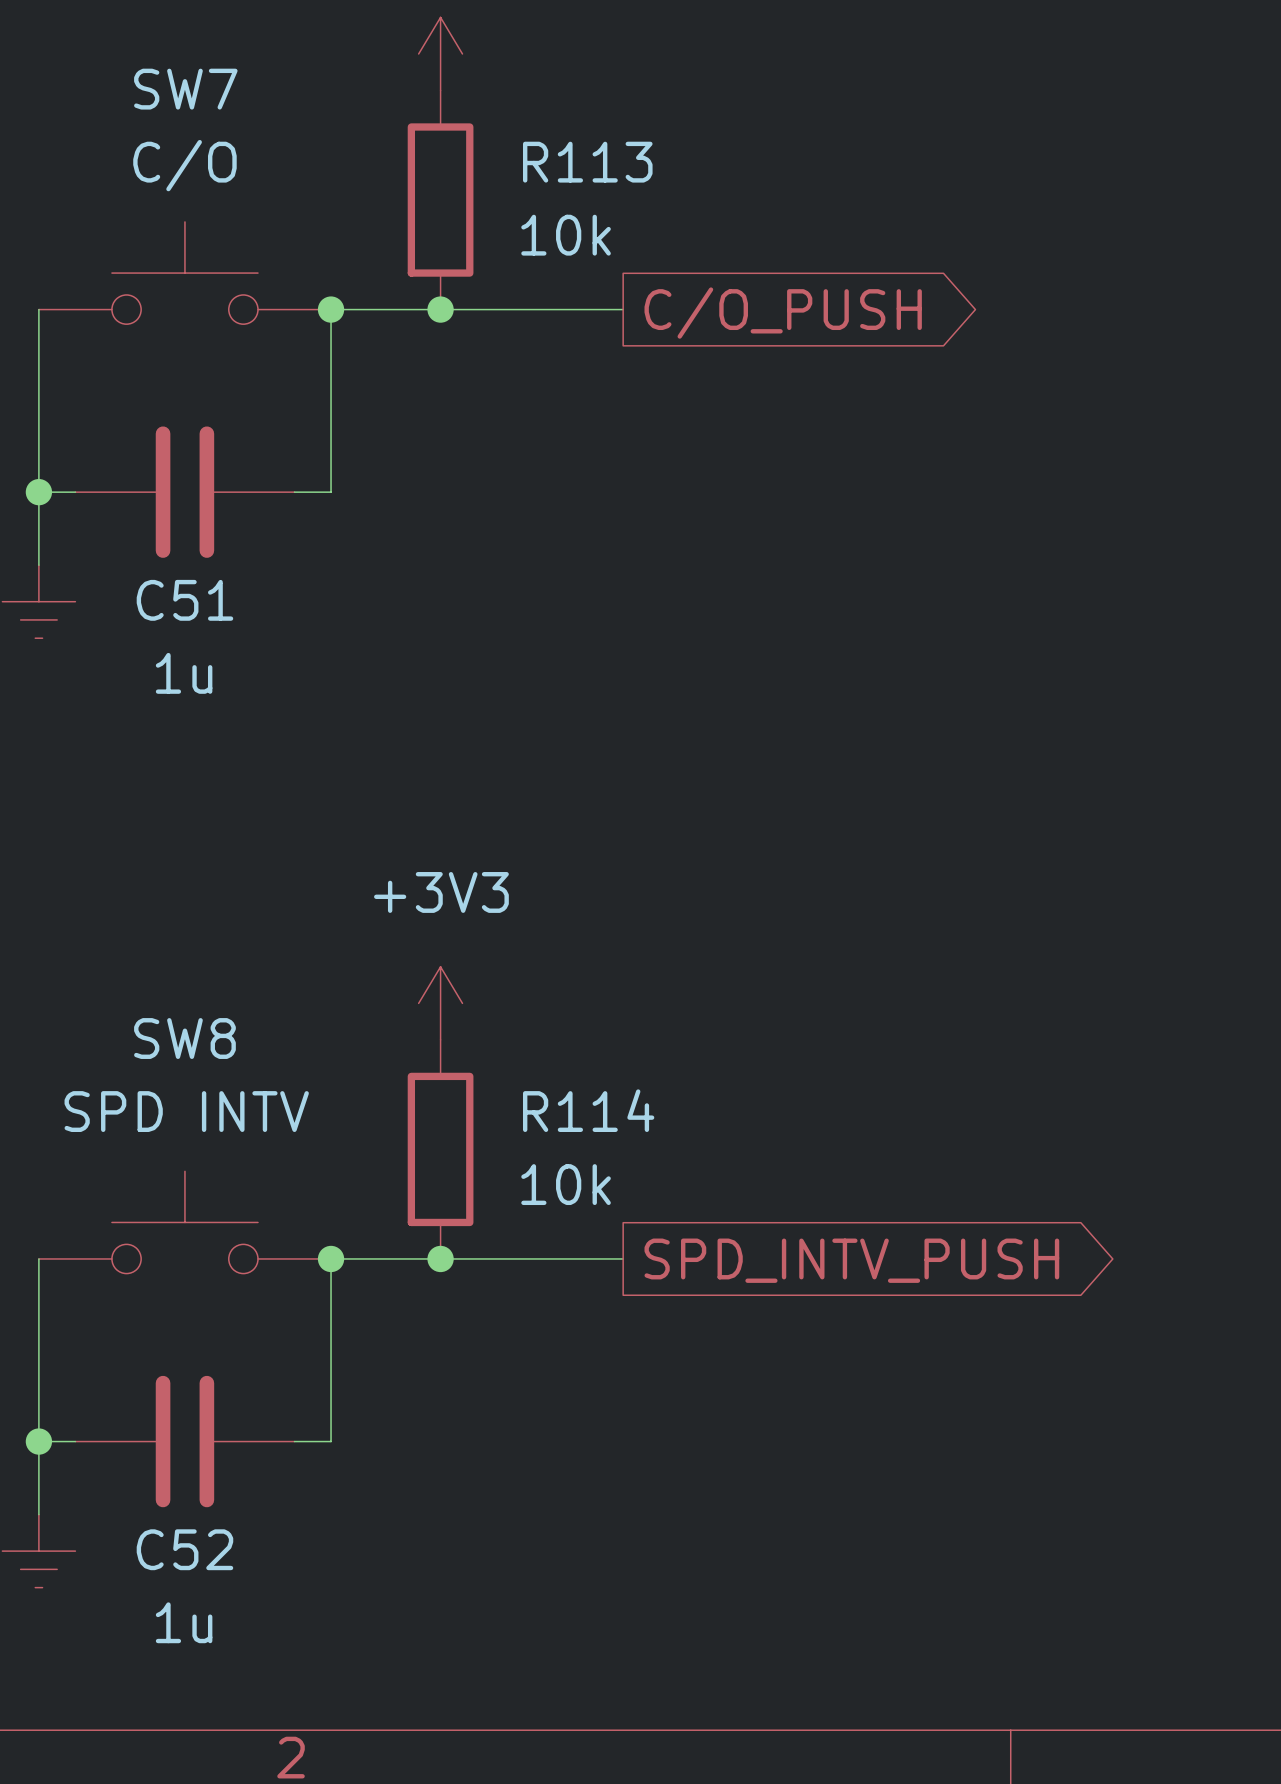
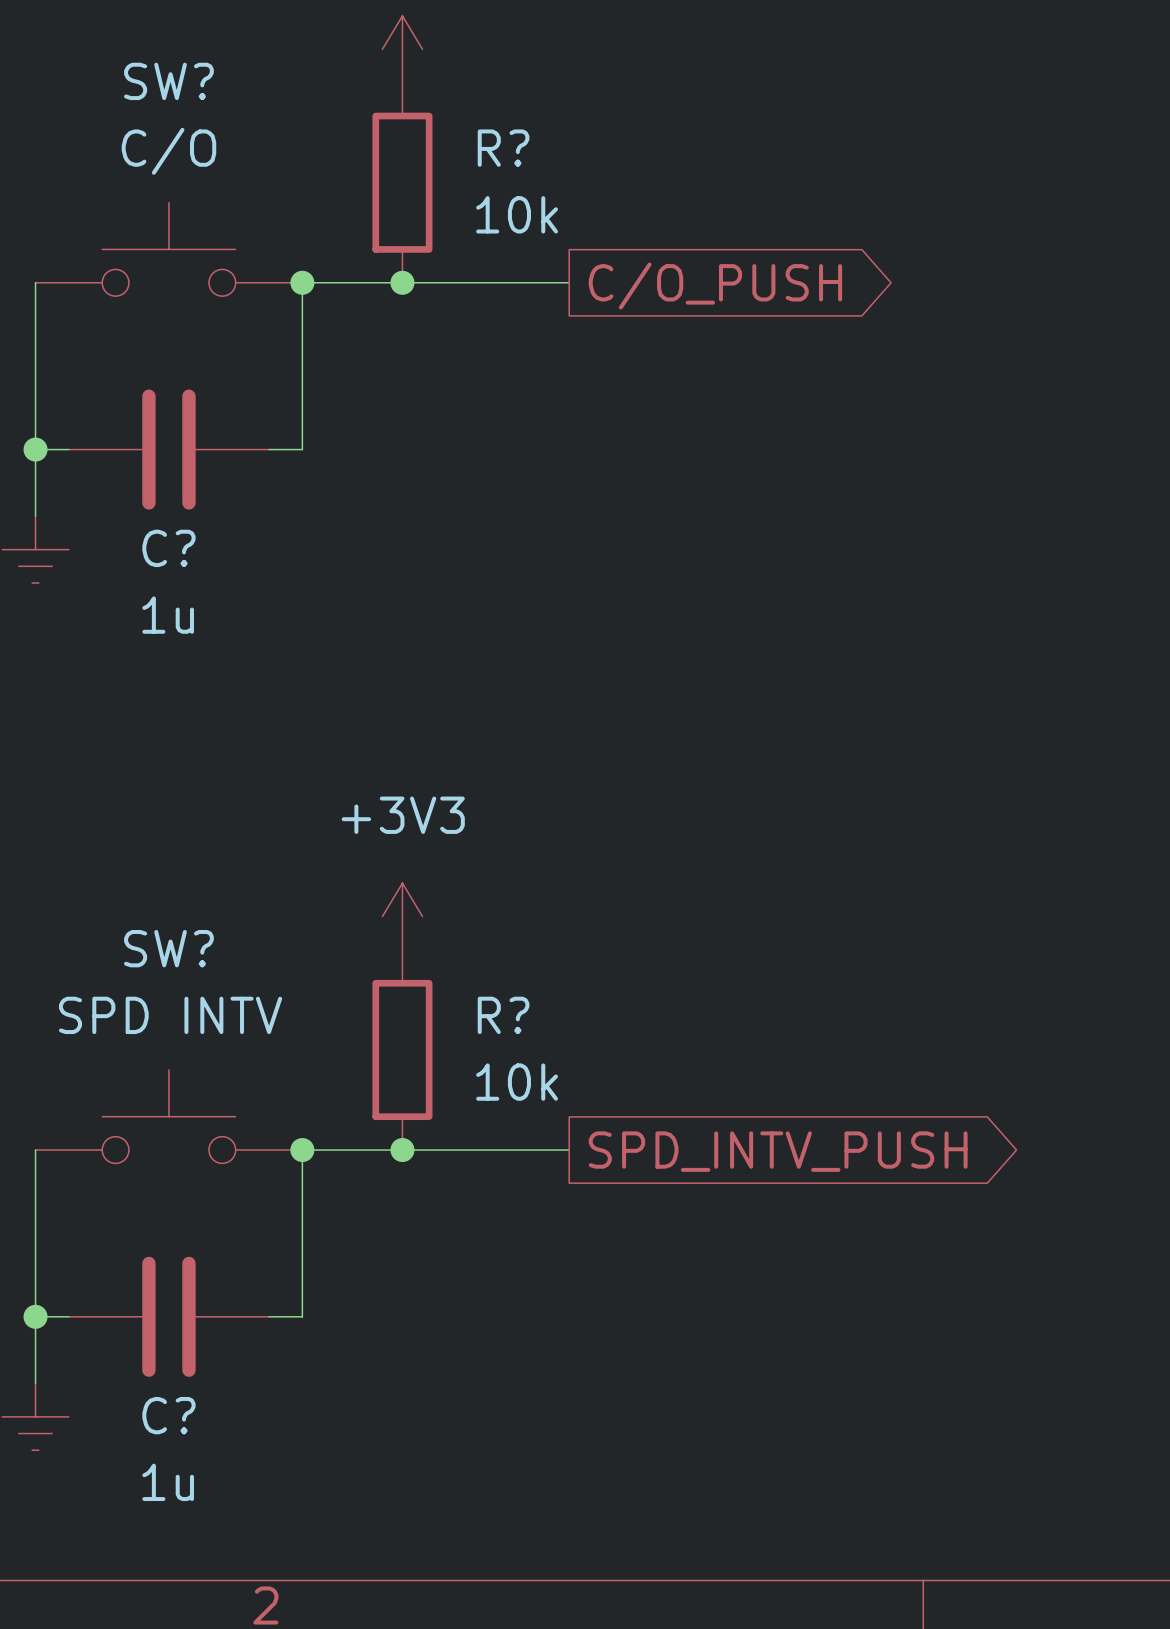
SW7 name: SW7 (185, 89) -> SW? (168, 81)
R113 name: R113 (587, 162) -> R? (503, 148)
C51 name: C51 (184, 600) -> C? (168, 548)
SW8 name: SW8 (184, 1038) -> SW? (168, 948)
R114 name: R114 (588, 1110) -> R? (503, 1015)
C52 name: C52 (184, 1549) -> C? (168, 1415)

